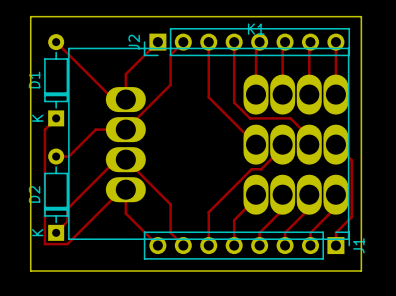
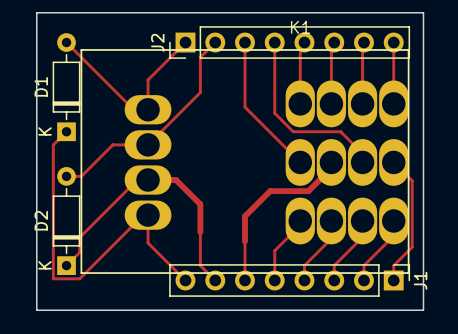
top track: (282, 147) (261, 169) (251, 169) (208, 212) -> (331, 166) (308, 191) (270, 191) (245, 216) (245, 241)
top track: (125, 159) (170, 204) -> (148, 180) (176, 180) (200, 204) (200, 232)

